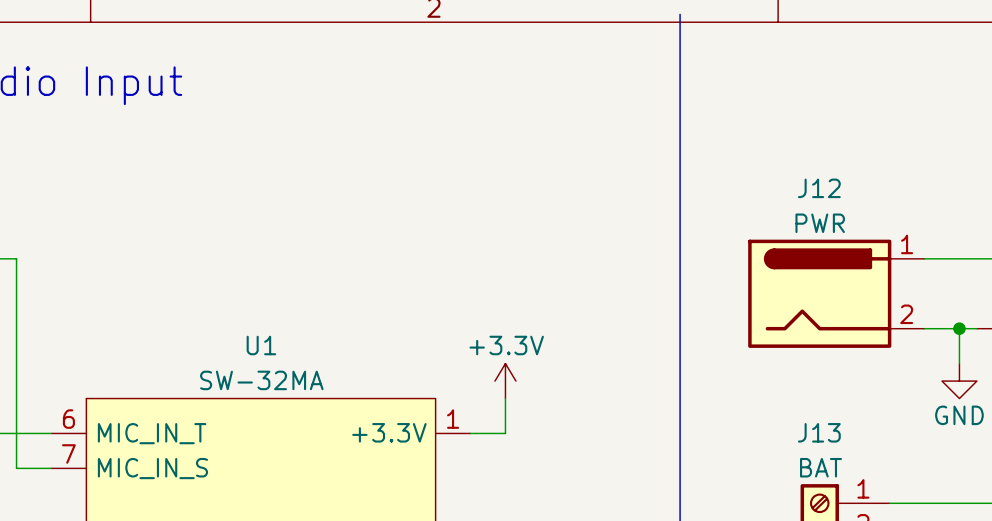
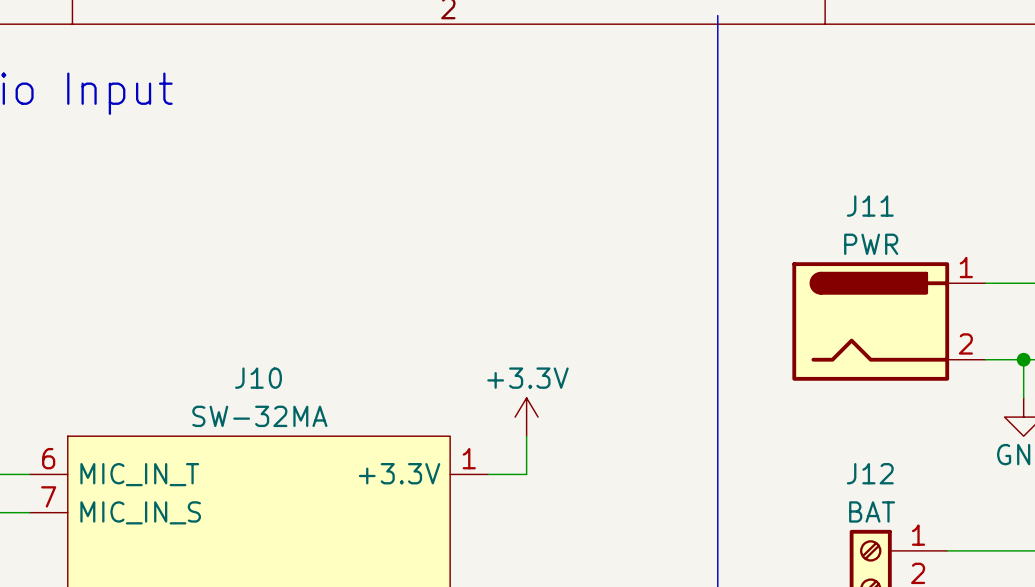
J12 name: J12 (819, 188) -> J11 (870, 206)
U1 name: U1 (261, 345) -> J10 (258, 378)
J13 name: J13 (819, 432) -> J12 (870, 473)

